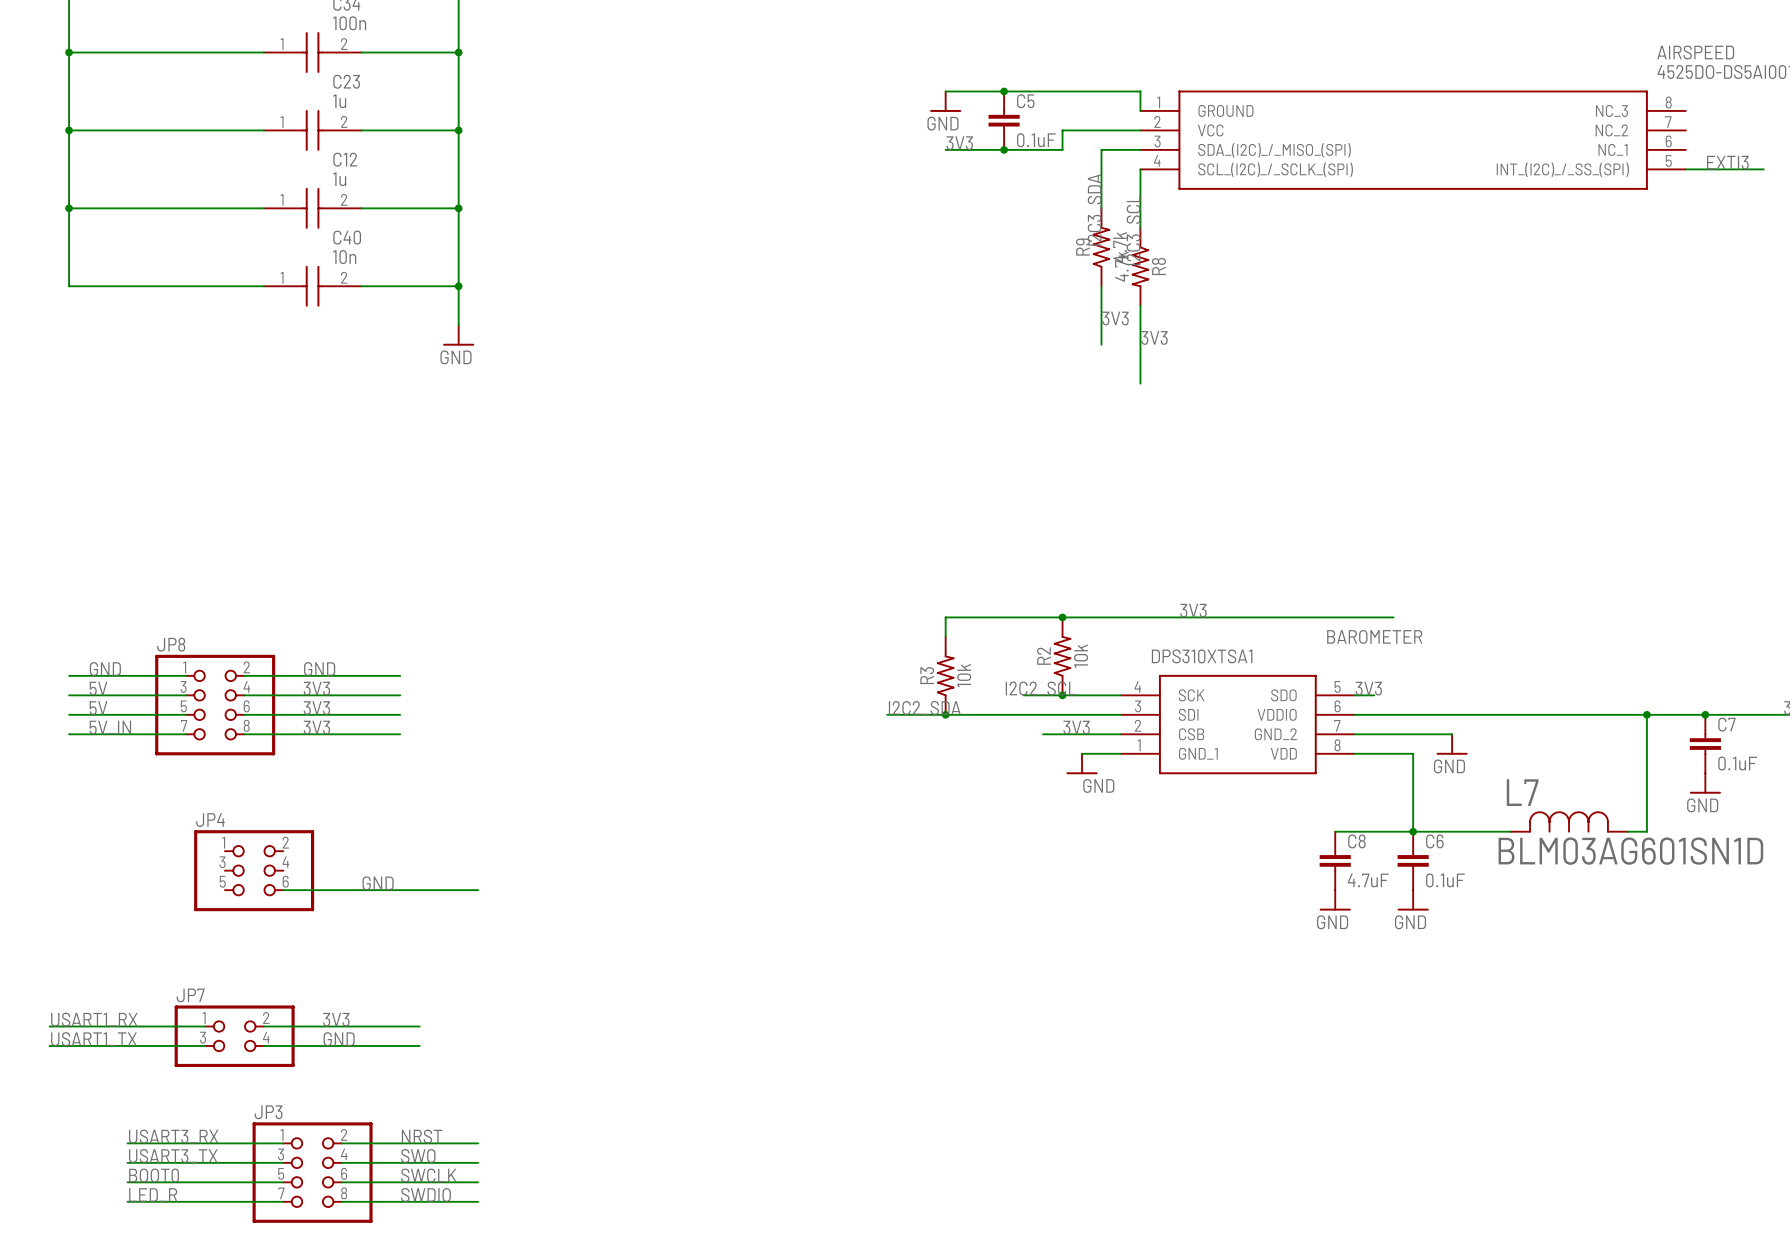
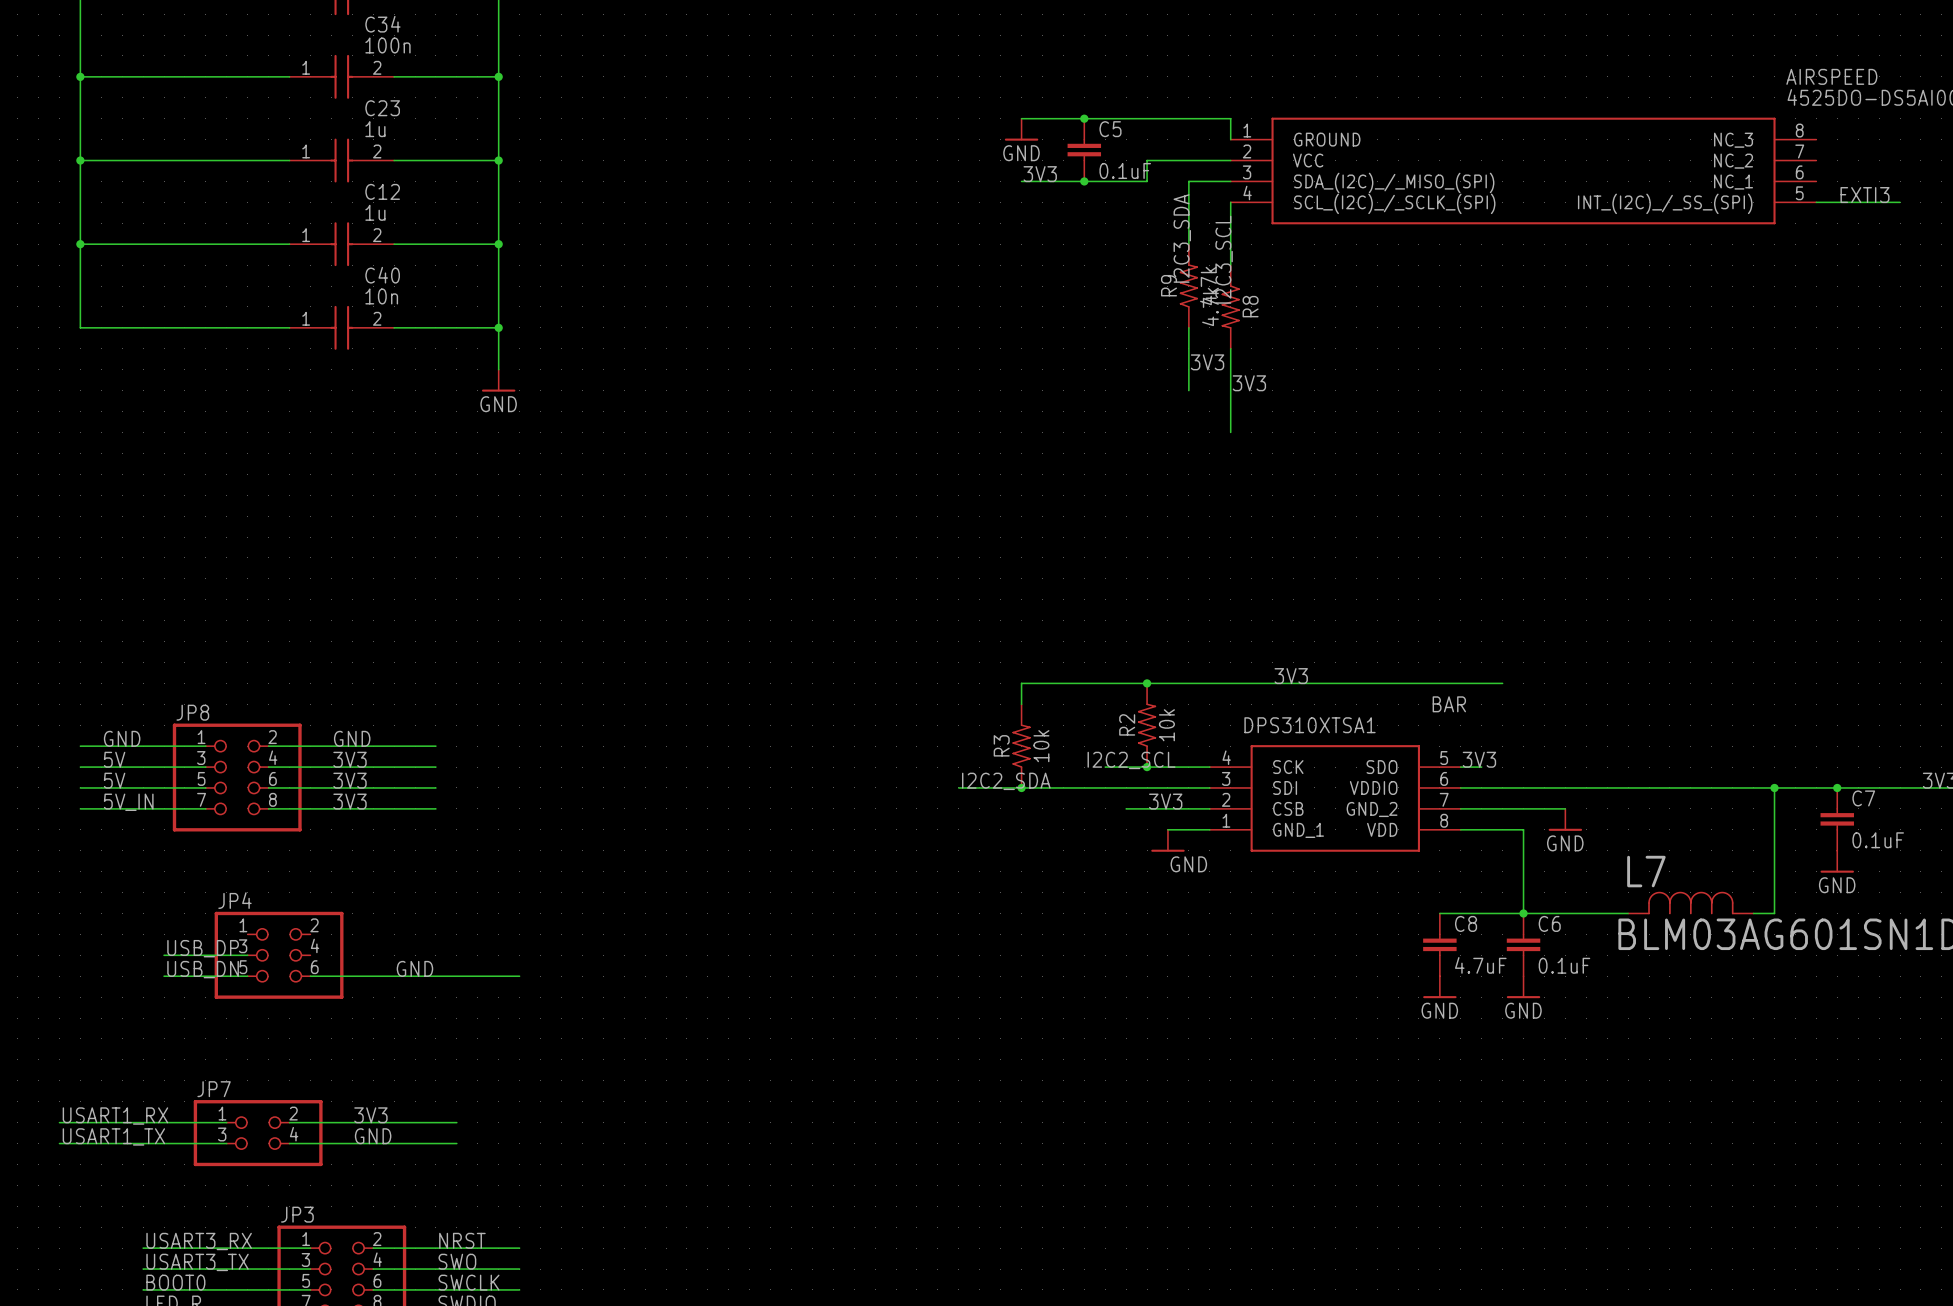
BAROMETER name: BAROMETER (1374, 636) -> BAR (1449, 704)
label: none -> USB_DP (203, 948)
wire: none -> (164, 955) (247, 955)
label: none -> USB_DN (203, 969)
wire: none -> (164, 976) (247, 976)

